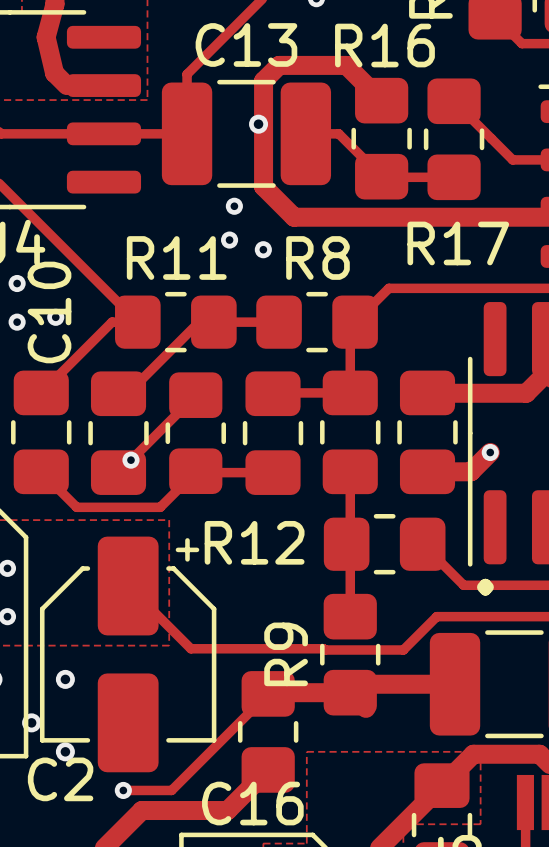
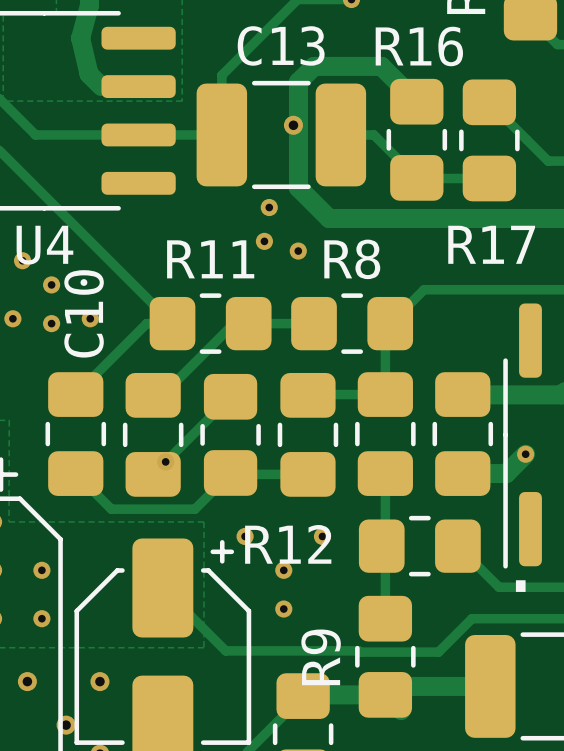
via: none -> (245, 536)
via: none -> (322, 536)
via: none -> (283, 570)
via: none -> (283, 609)

